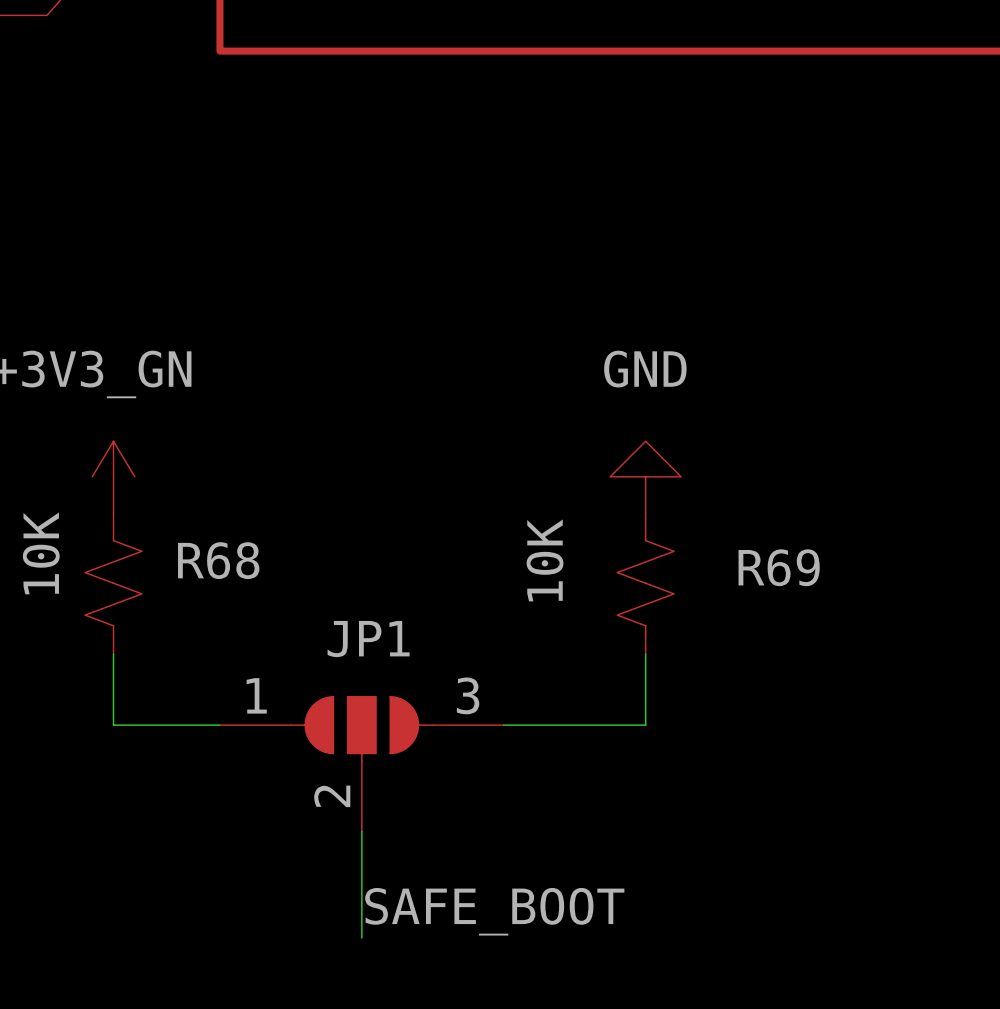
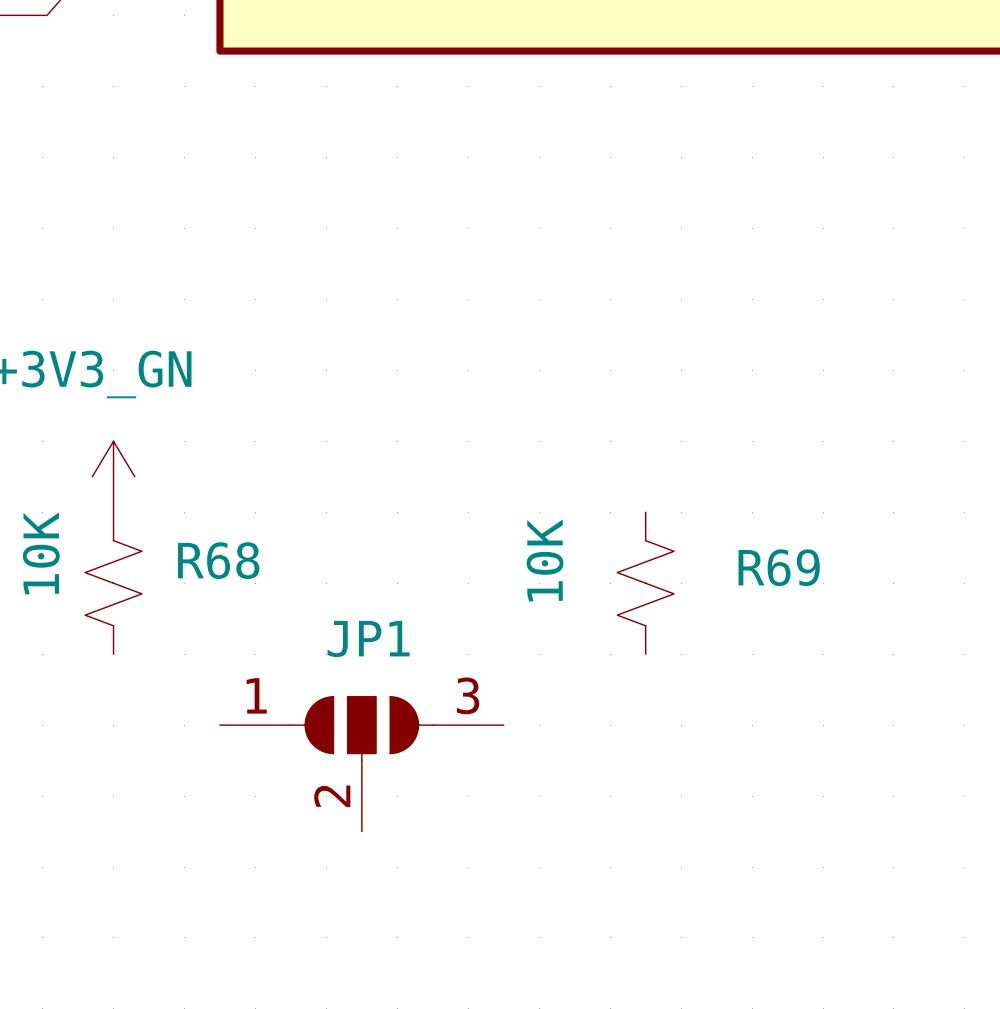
power symbol: GND (645, 476) -> none
wire: (113, 654) (113, 725) (219, 725) -> none
wire: (645, 654) (645, 725) (503, 725) -> none
wire: (361, 831) (361, 937) -> none
label: SAFE_BOOT (494, 911) -> none

